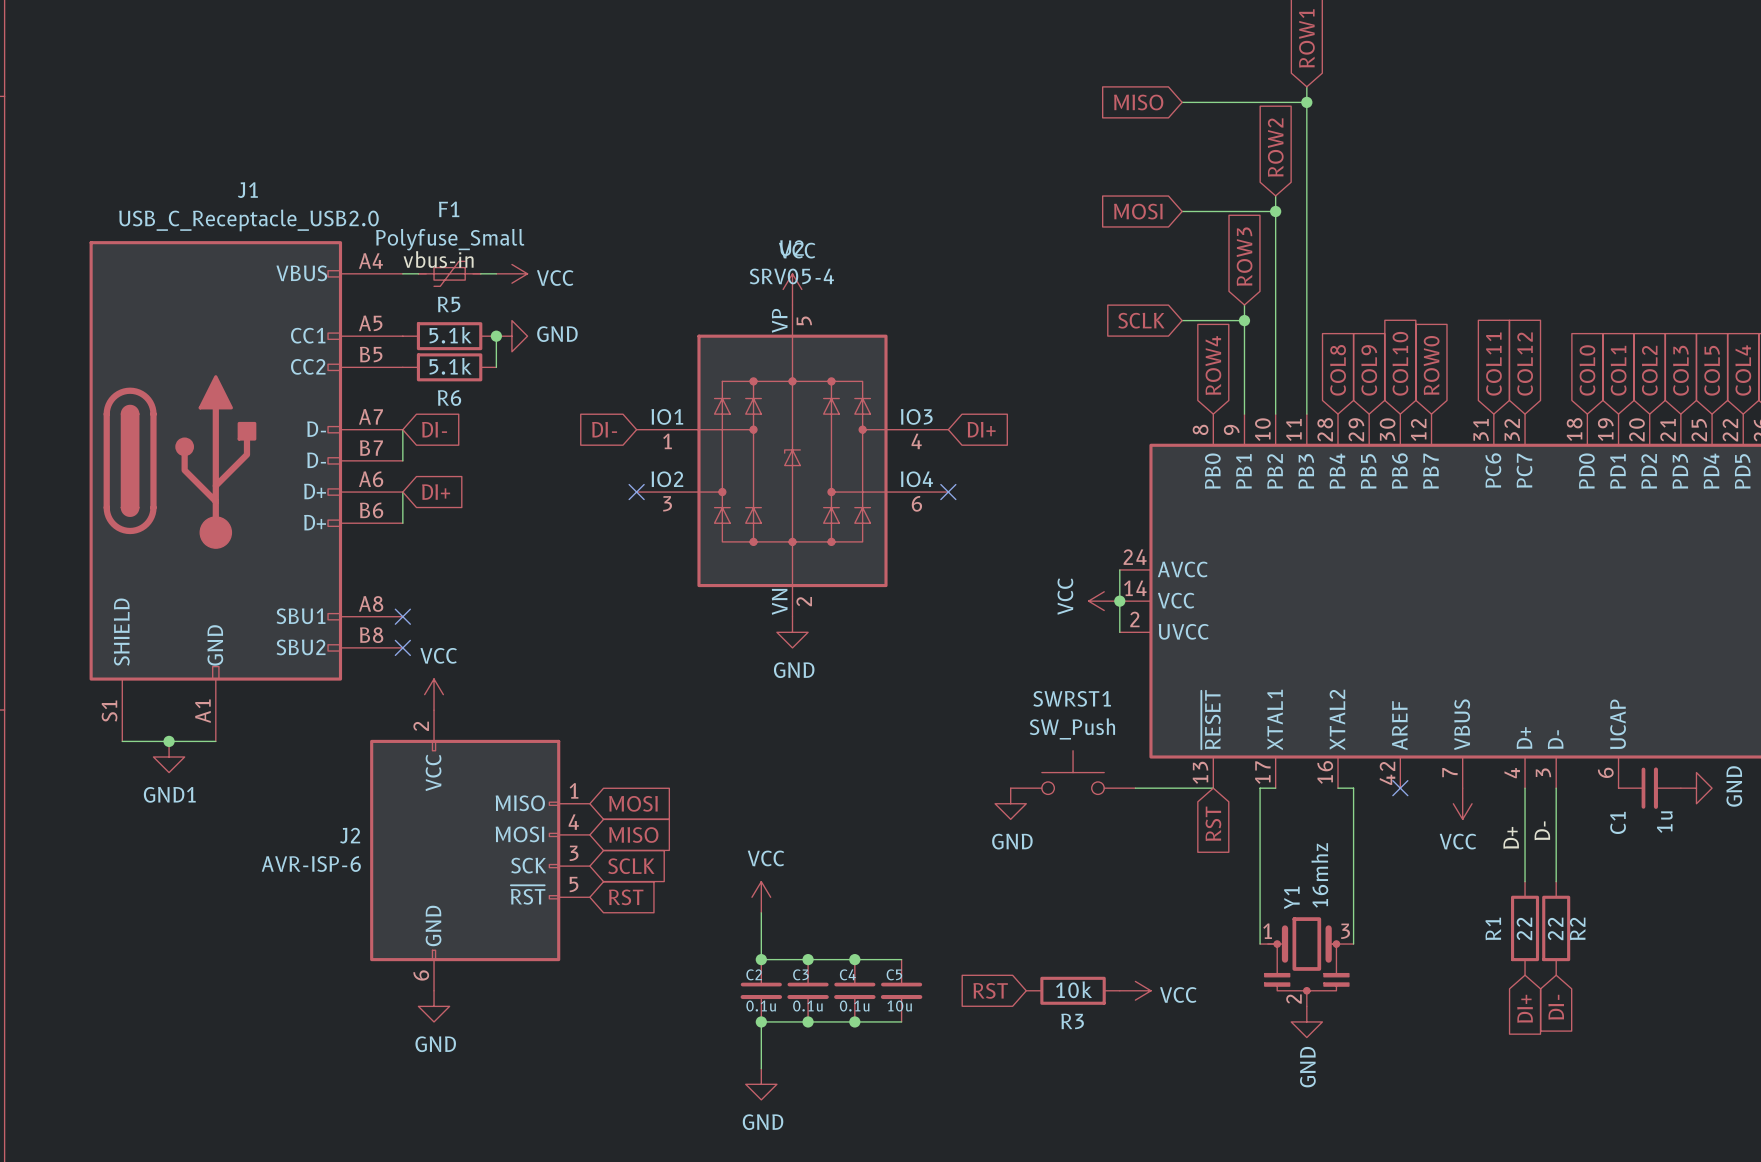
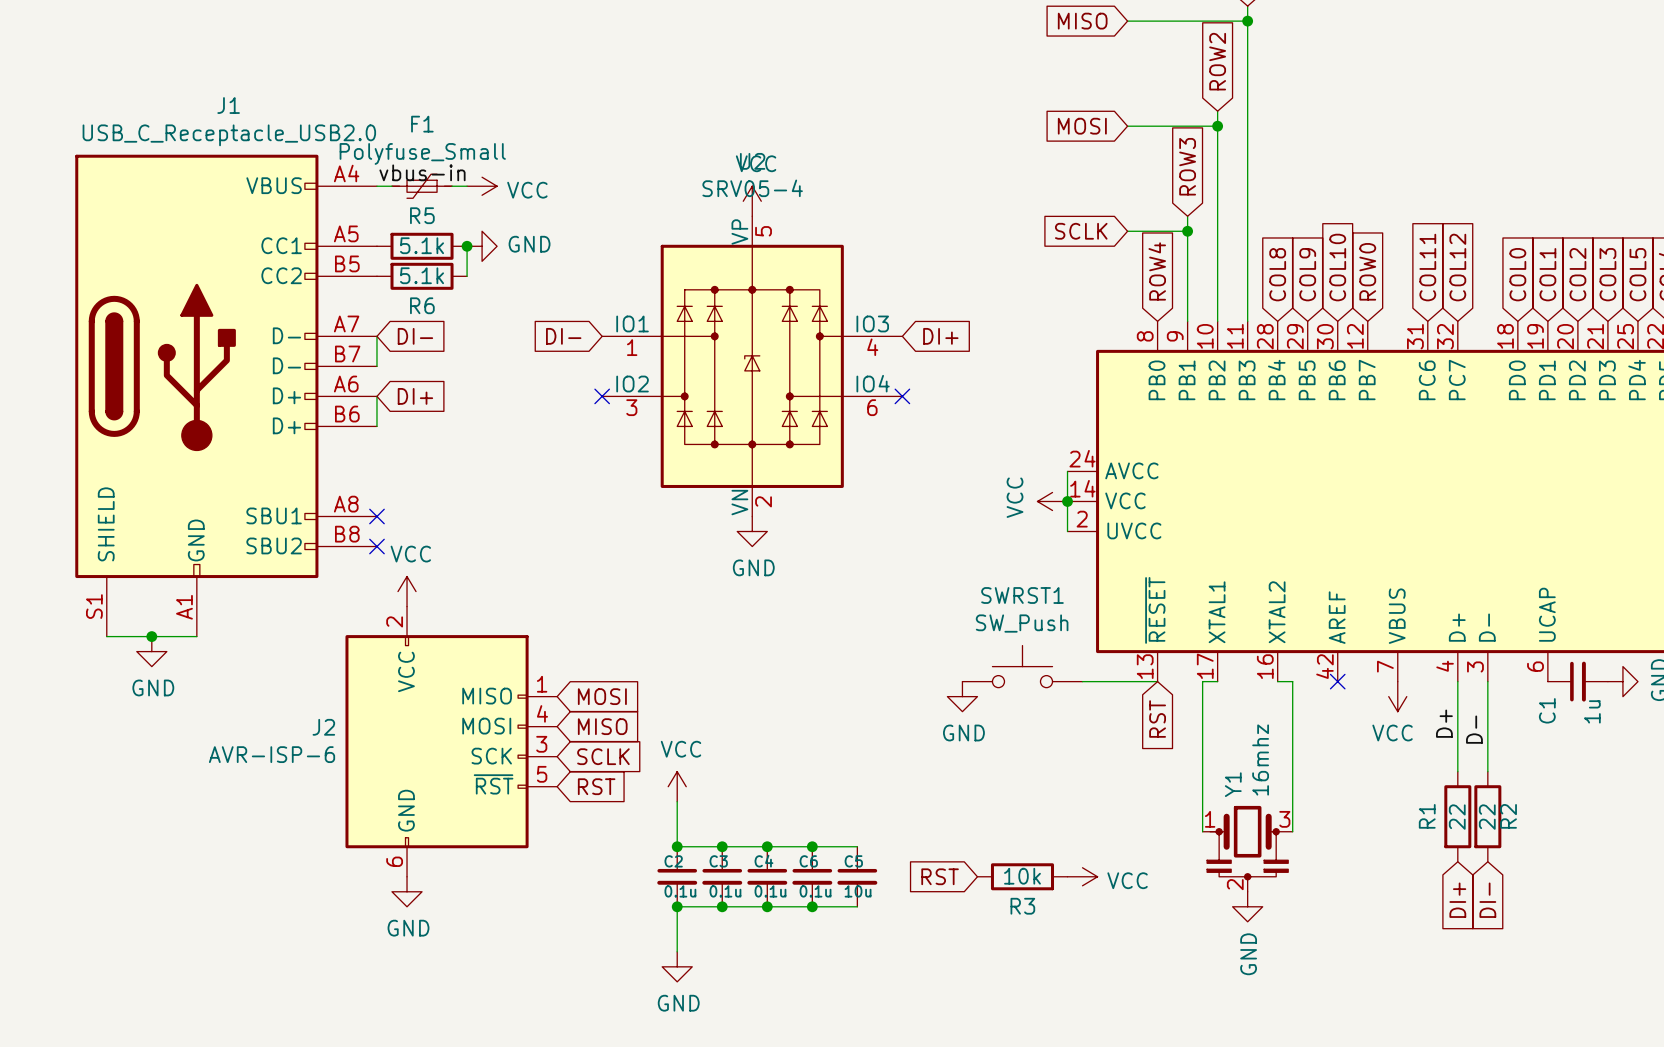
power symbol: GND1 (169, 757) -> GND (151, 651)
power symbol position: VCC (761, 897) -> VCC (677, 786)
wire: (761, 912) (761, 959) -> (677, 801) (677, 846) (722, 846)
junction: none -> (677, 846)
C2 name: C2 (754, 974) -> C3 (718, 861)
C3 name: C3 (800, 974) -> C4 (763, 861)
C4 name: C4 (847, 974) -> C6 (808, 861)
C2: none -> 0.1u (677, 876)
junction: none -> (677, 906)
wire: (761, 1021) (761, 1068) -> (722, 906) (677, 906) (677, 951)
power symbol position: GND (761, 1084) -> GND (677, 966)

